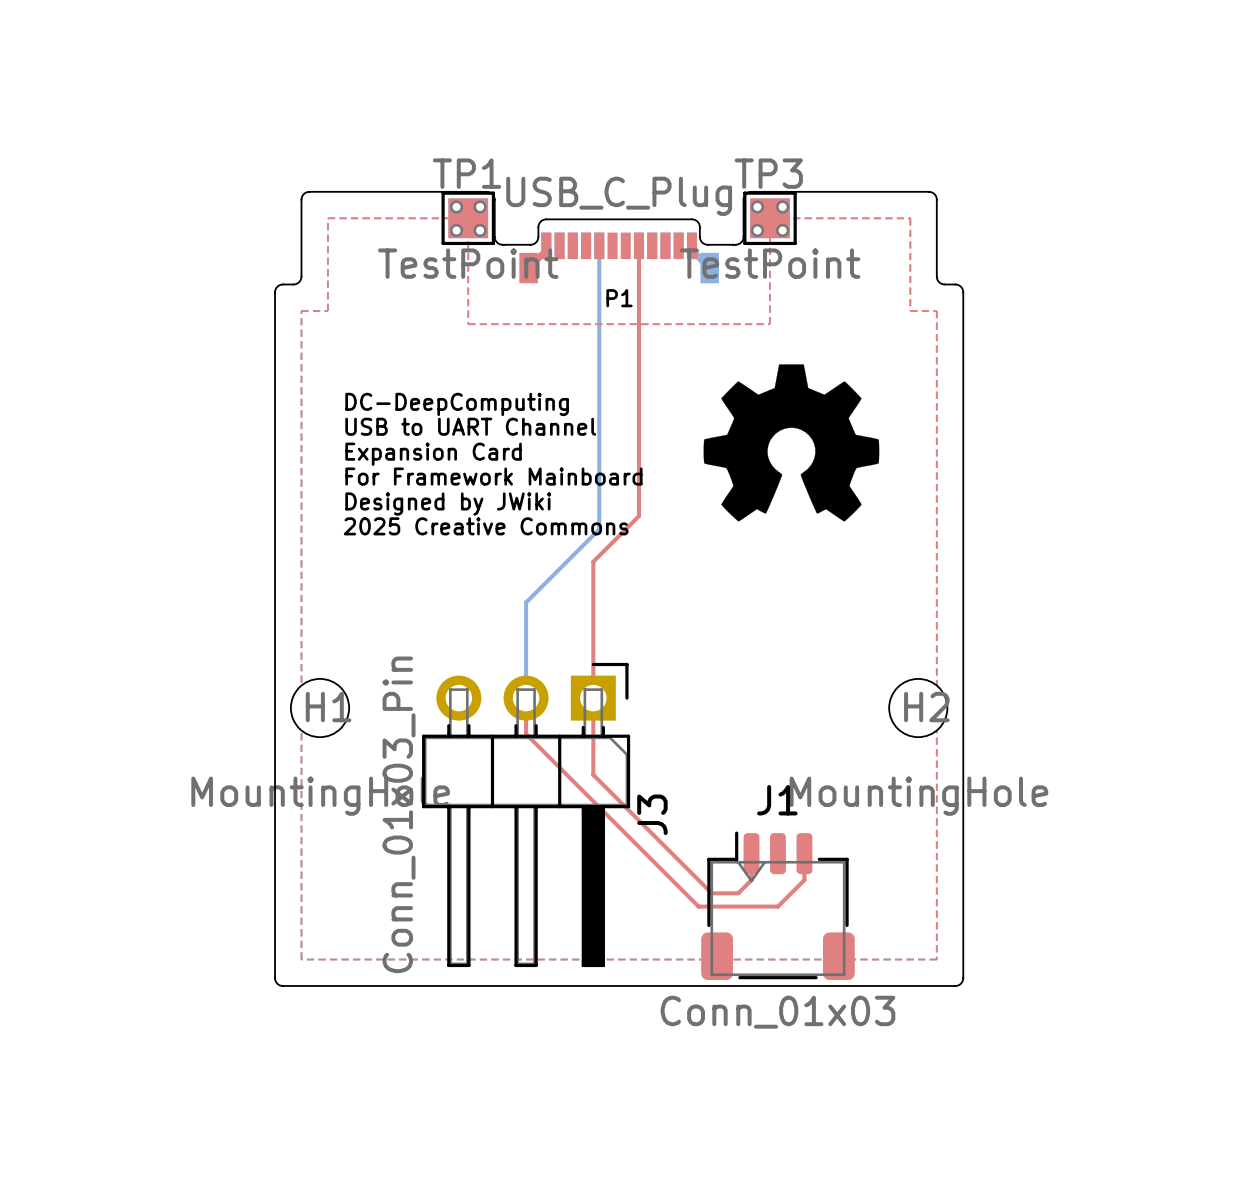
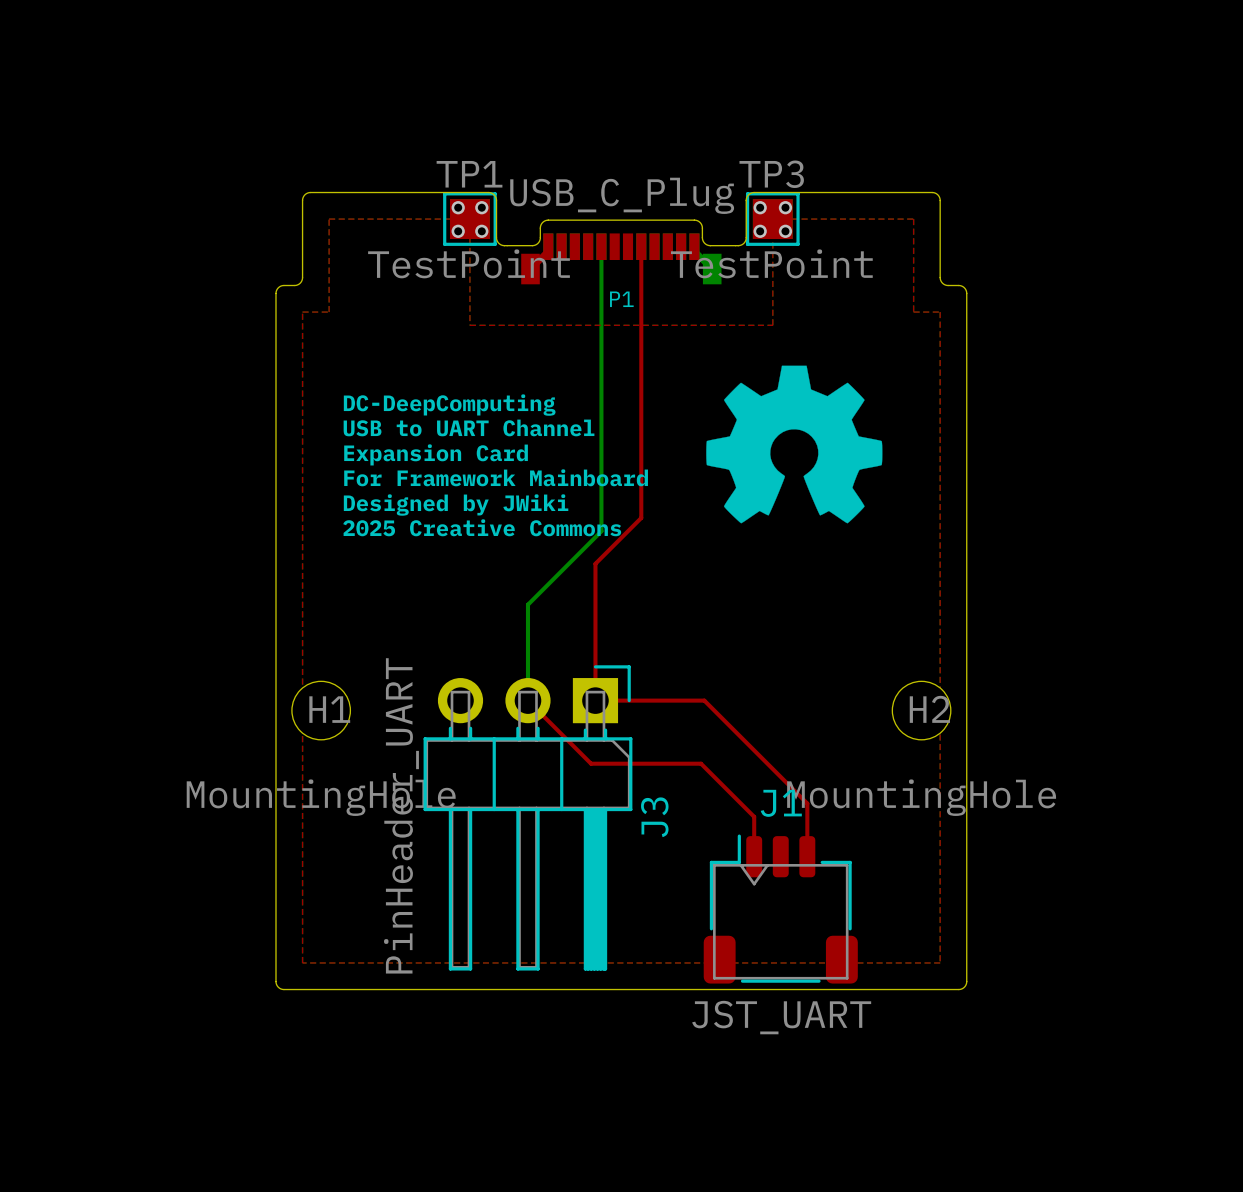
top track: (526, 698) (526, 734) (698, 906) (777, 906) (804, 880) (804, 853) -> (527, 700) (591, 763) (701, 763) (754, 816) (754, 856)
top track: (593, 698) (593, 774) (711, 893) (738, 893) (751, 880) (751, 853) -> (595, 700) (704, 700) (807, 803) (807, 856)
J3 value: Conn_01x03_Pin (399, 814) -> PinHeader_UART (401, 815)
J1 value: Conn_01x03 (777, 1012) -> JST_UART (781, 1017)

